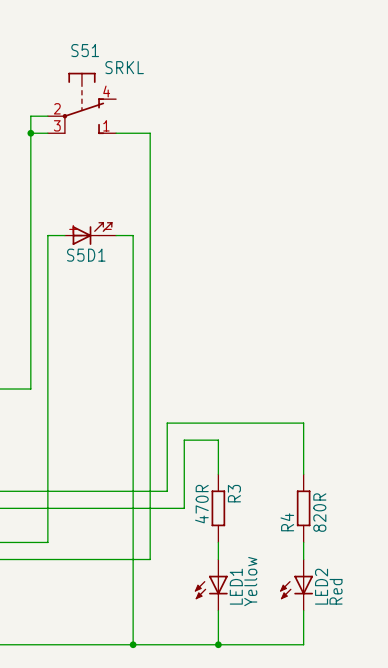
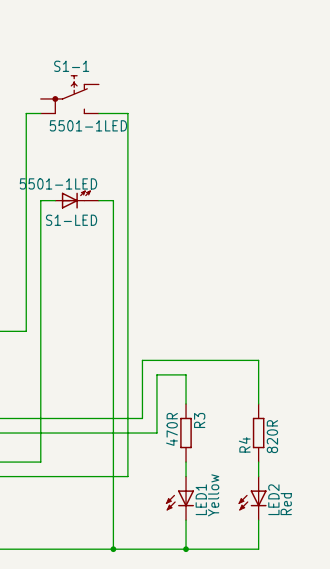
S51: SRKL (81, 103) -> none
S1-1: none -> 5501-1LED (69, 94)
wire: (47, 116) (30, 116) (30, 133) -> none
junction: (30, 133) -> none
S5D1: (90, 233) -> none
S1-LED: none -> 5501-1LED (77, 199)

